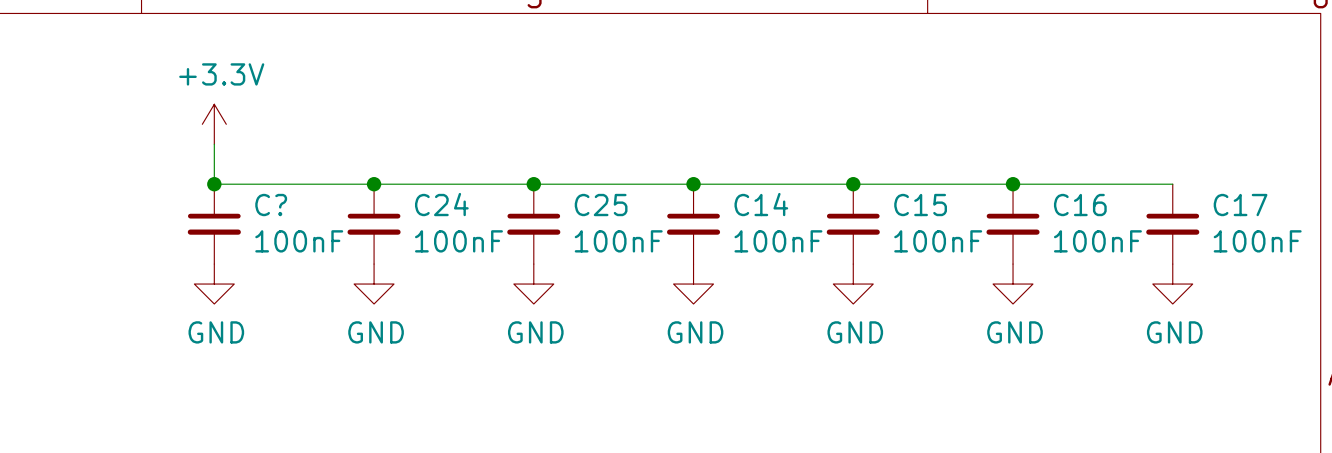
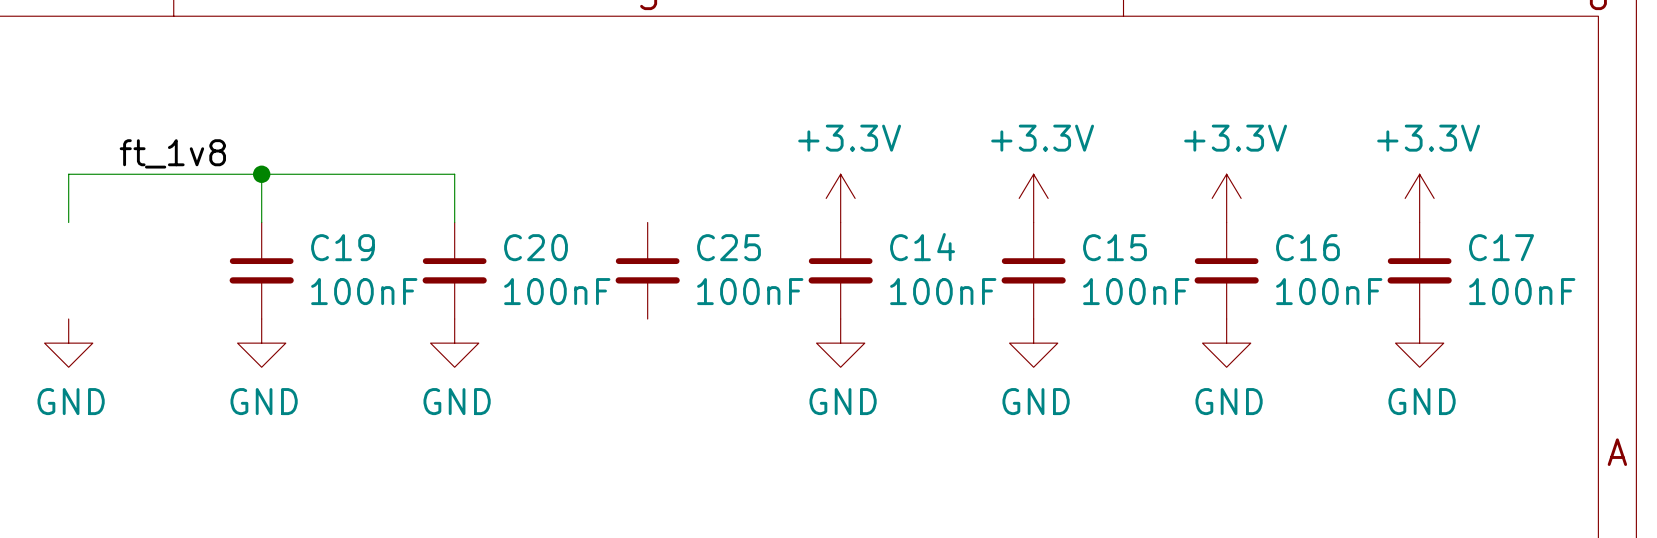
power symbol: +3.3V (214, 124) -> none
label: none -> ft_1v8 (172, 153)
power symbol: none -> +3.3V (840, 198)
power symbol: none -> +3.3V (1033, 198)
power symbol: none -> +3.3V (1226, 198)
power symbol: none -> +3.3V (1419, 198)
wire: none -> (68, 222) (68, 174) (454, 174) (454, 222)
wire: (214, 184) (1172, 184) -> none
junction position: (214, 184) -> (261, 174)
junction: (374, 184) -> none
junction: (533, 184) -> none
junction: (693, 184) -> none
junction: (853, 184) -> none
junction: (1013, 184) -> none
C24 name: C24 (441, 204) -> C20 (536, 247)
C? name: C? (271, 205) -> C19 (343, 247)
power symbol: none -> GND (68, 343)
power symbol: GND (533, 284) -> none

